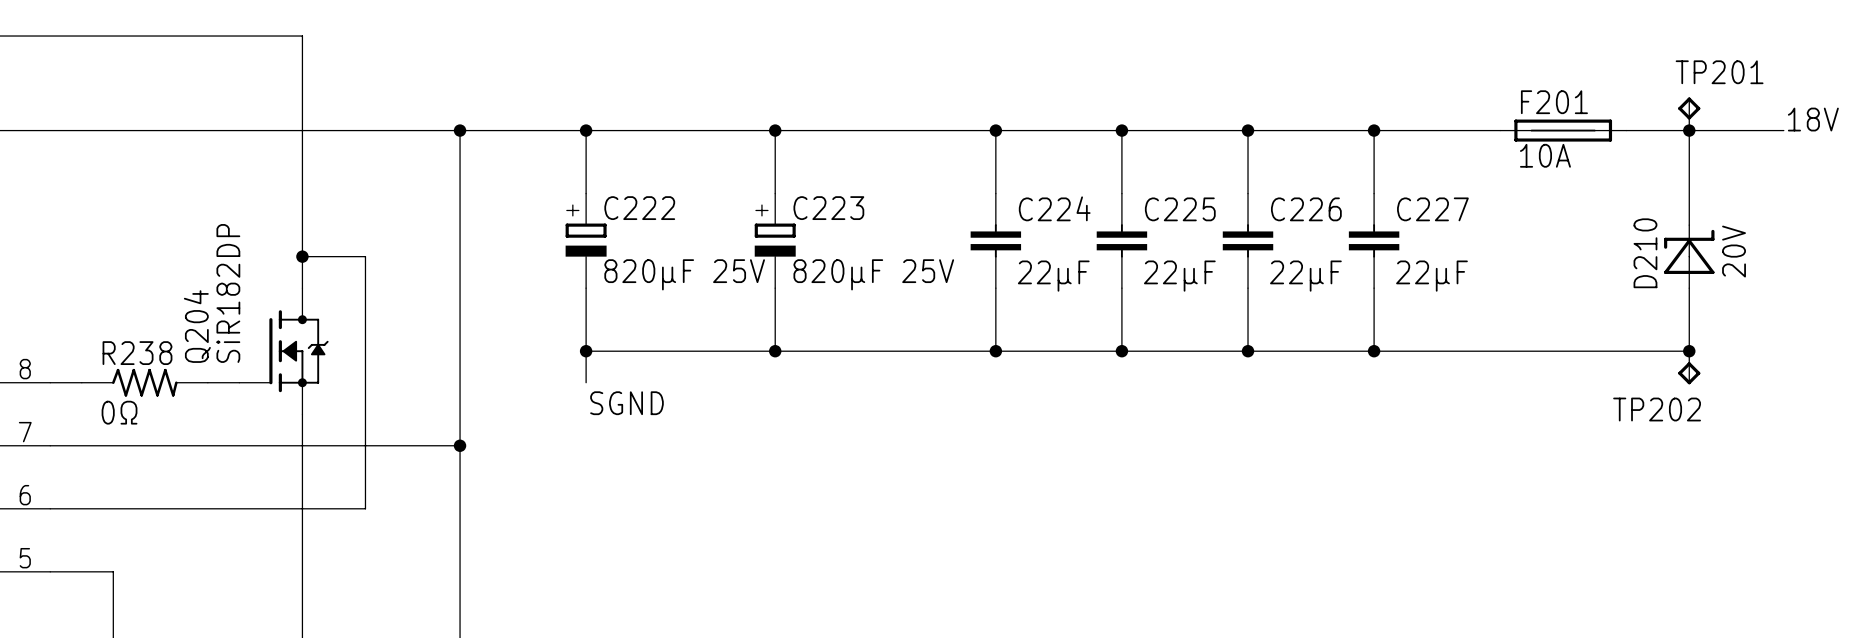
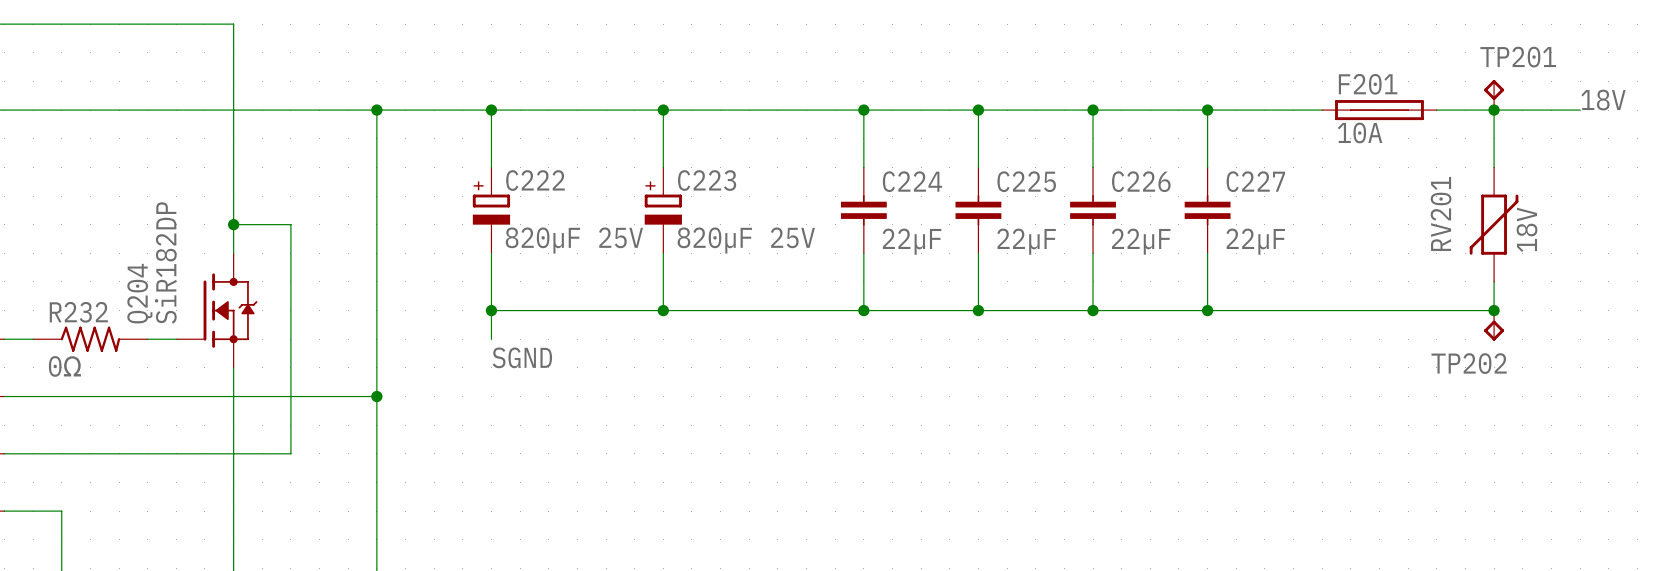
D210: 20V (1689, 256) -> none
RV201: none -> 18V (1494, 224)
R238 name: R238 (137, 353) -> R232 (78, 312)

